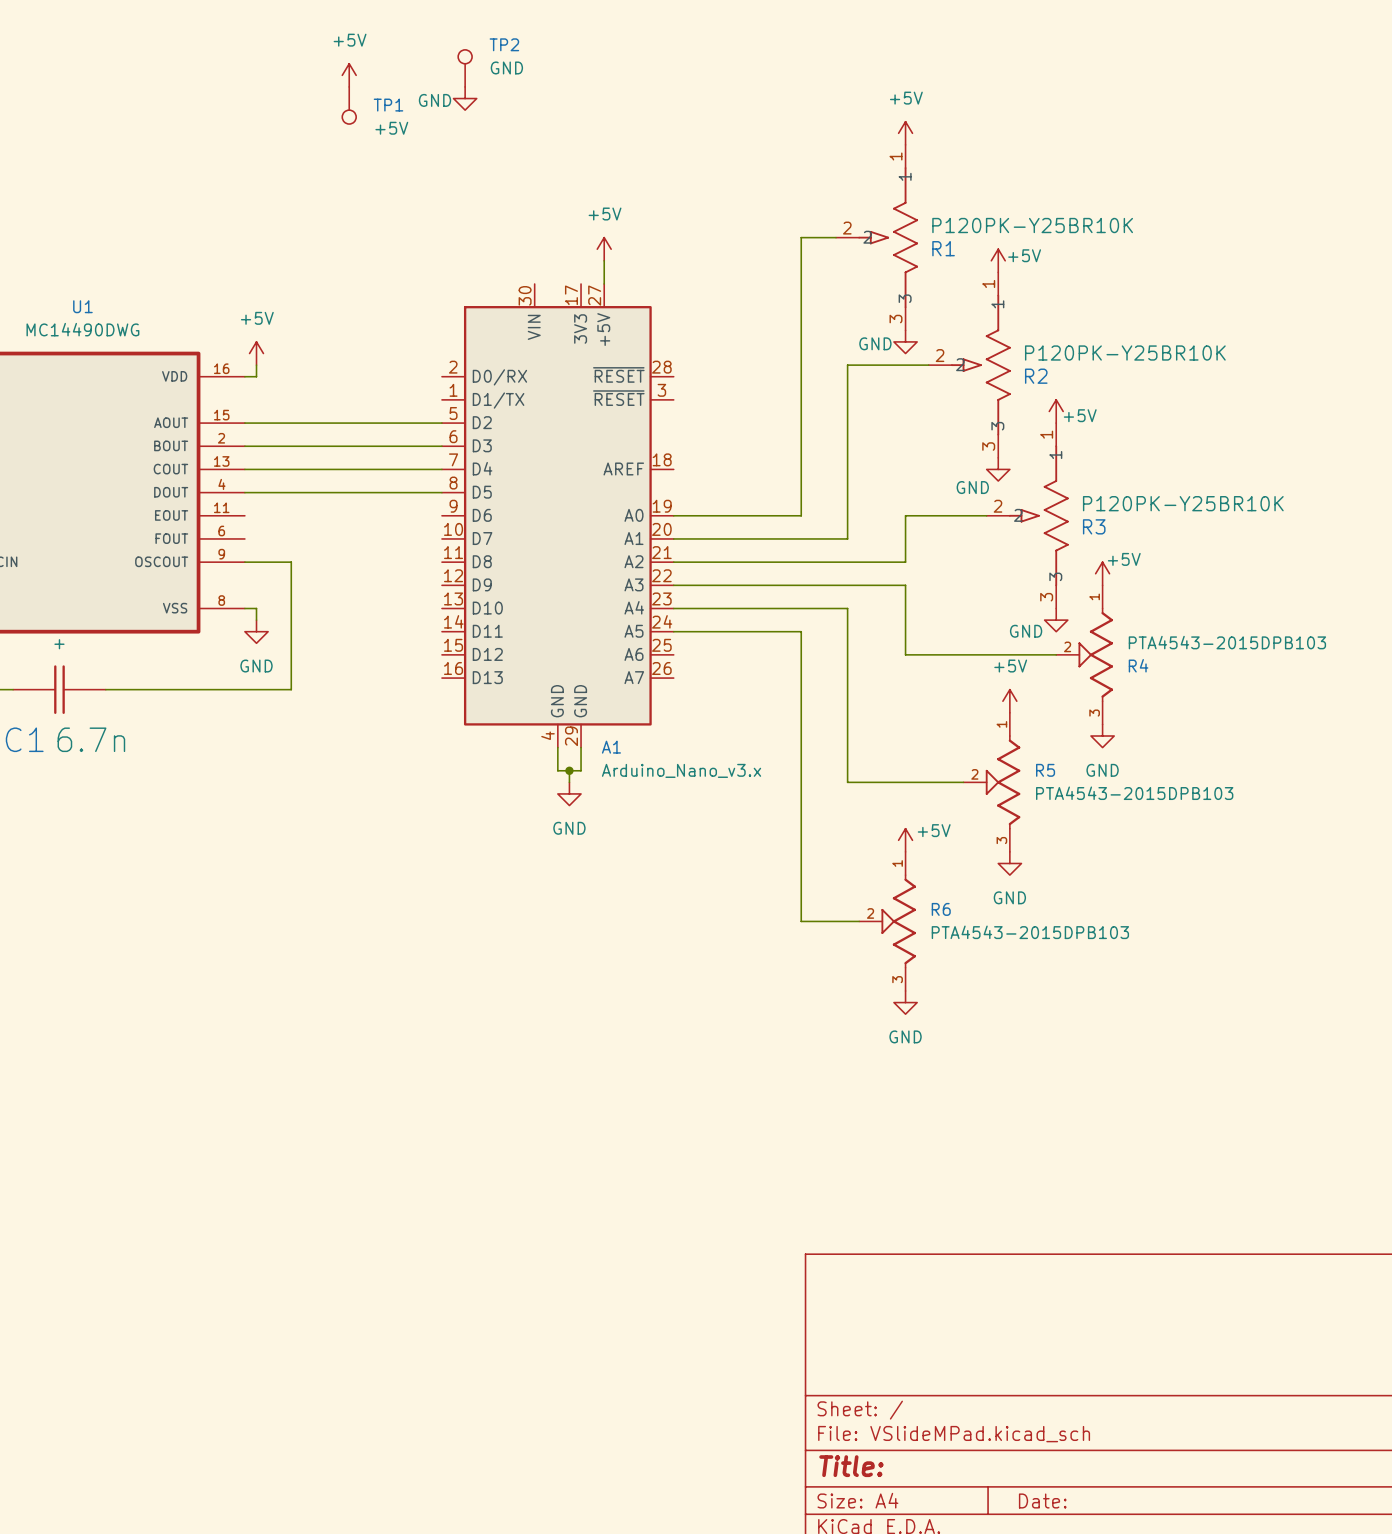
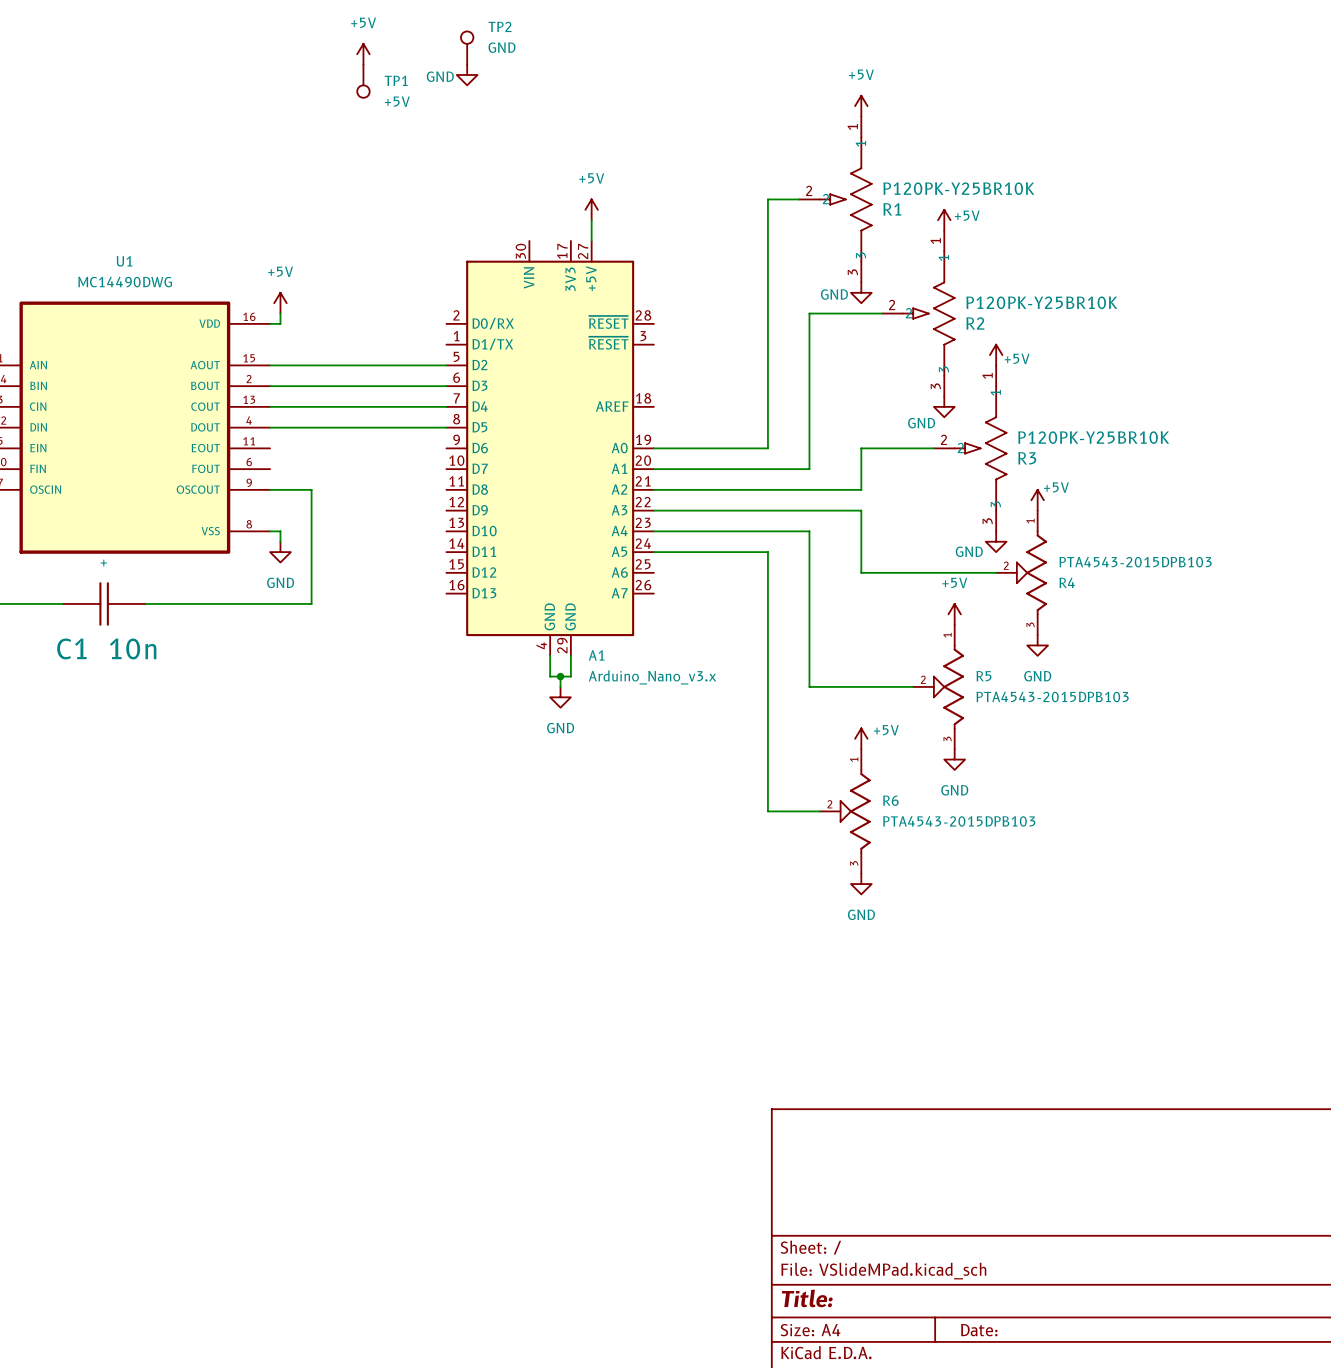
C1 value: 6.7n (91, 739) -> 10n (133, 648)

